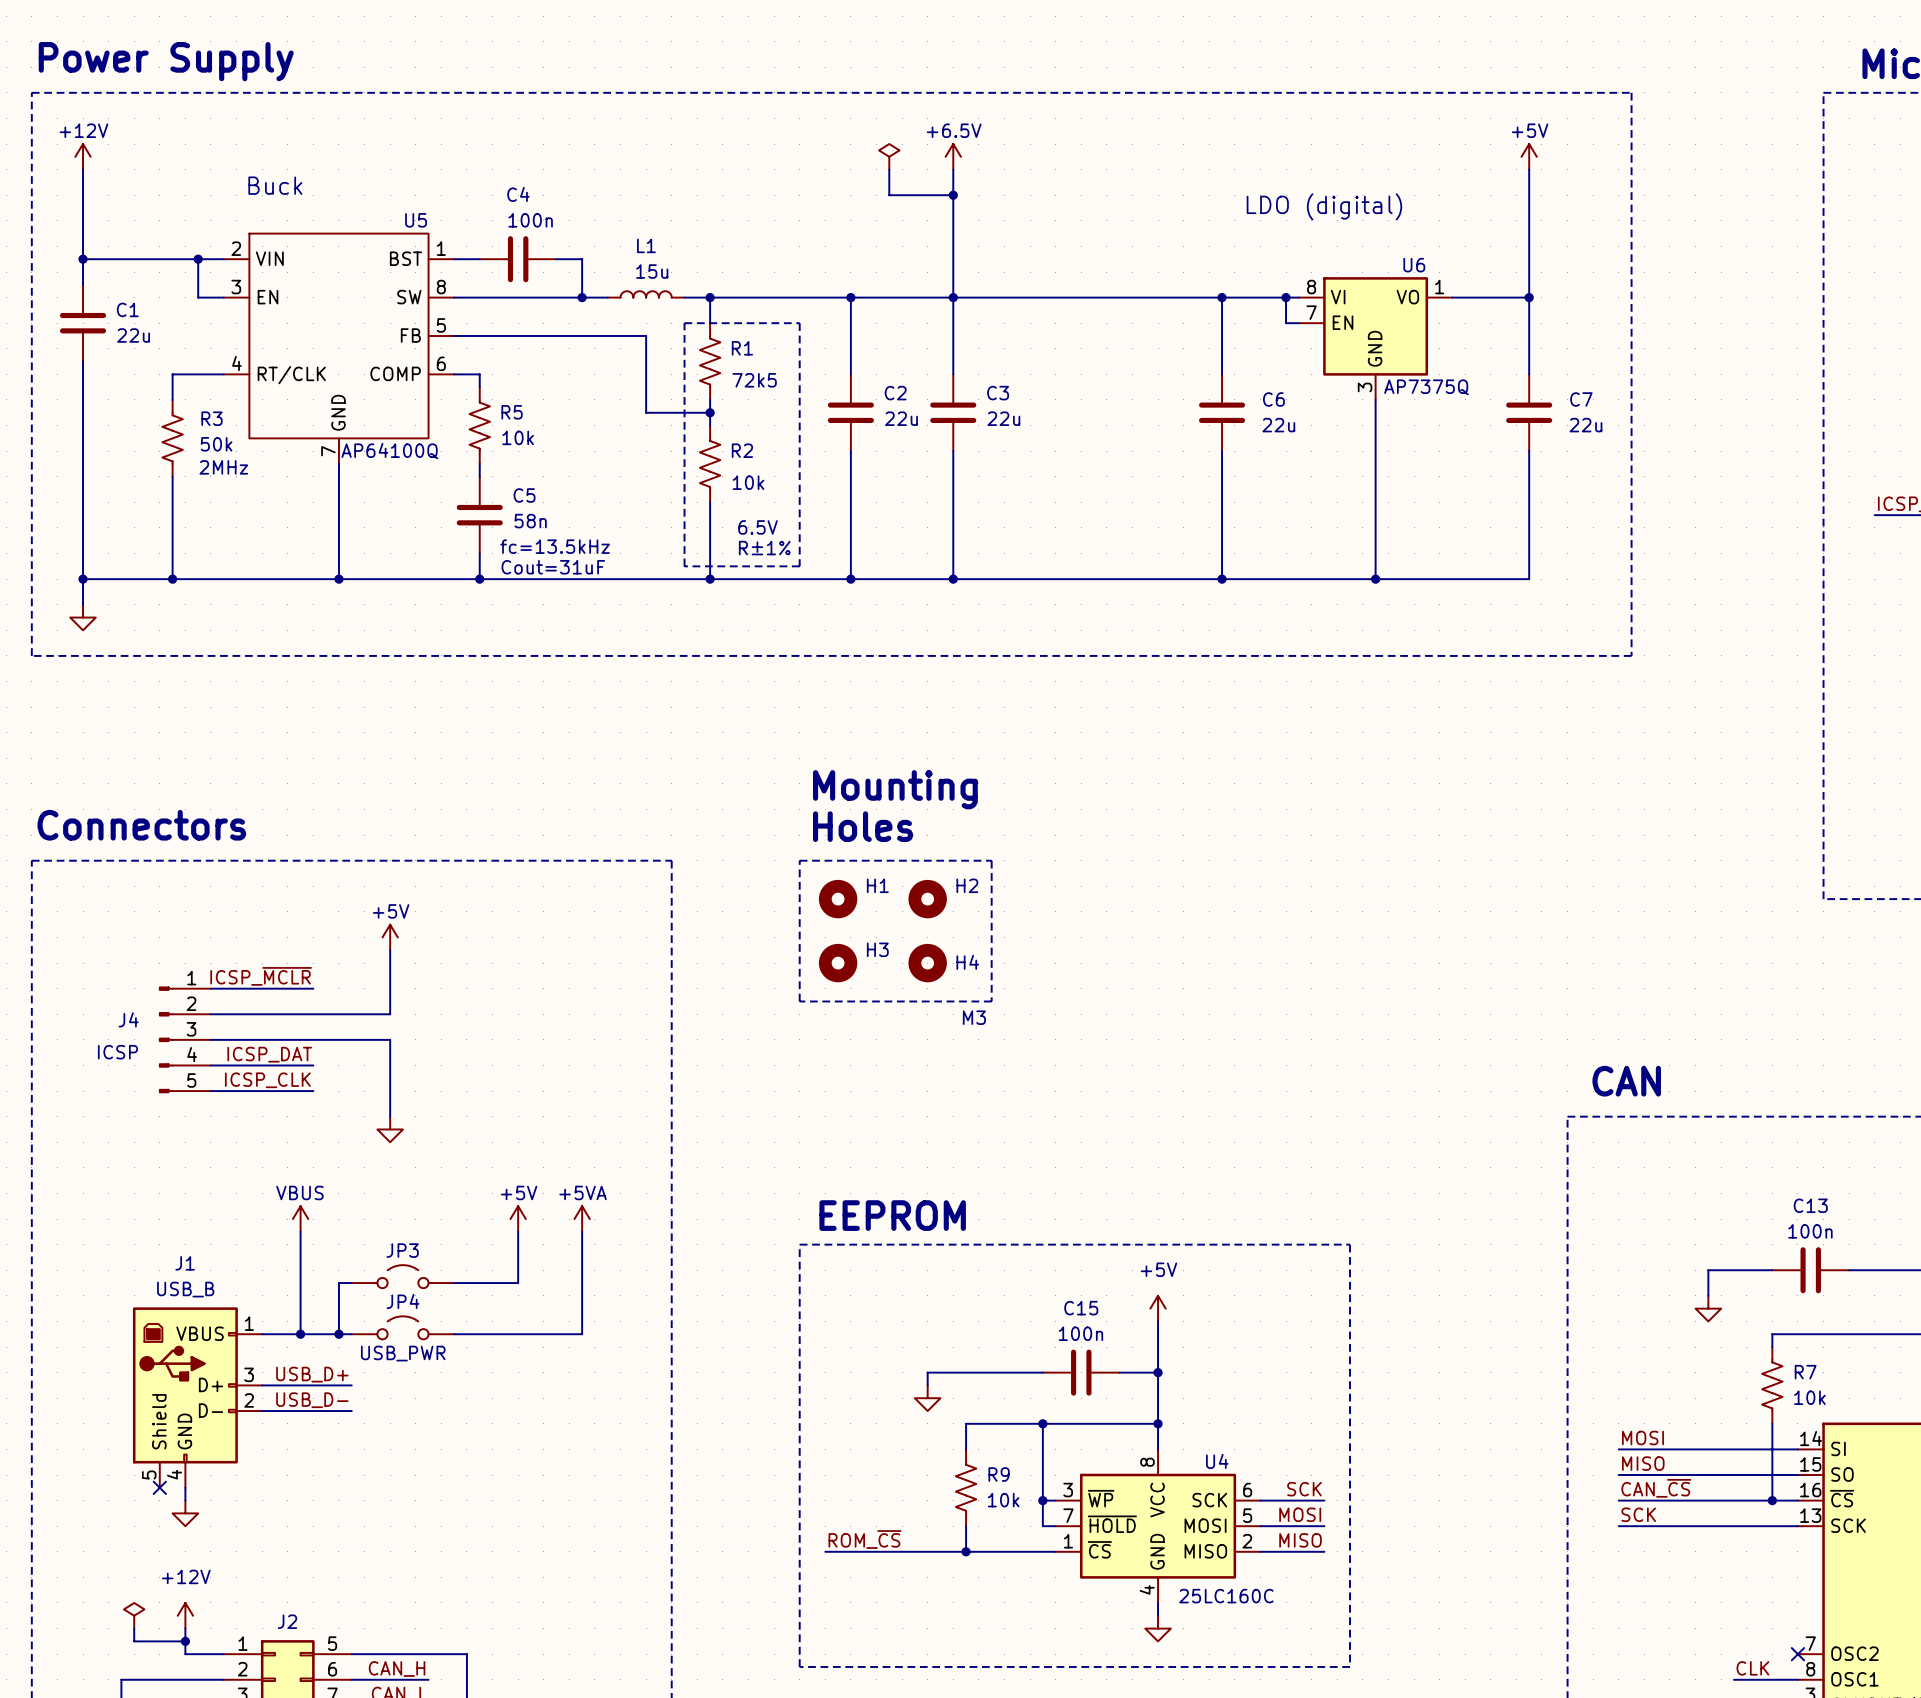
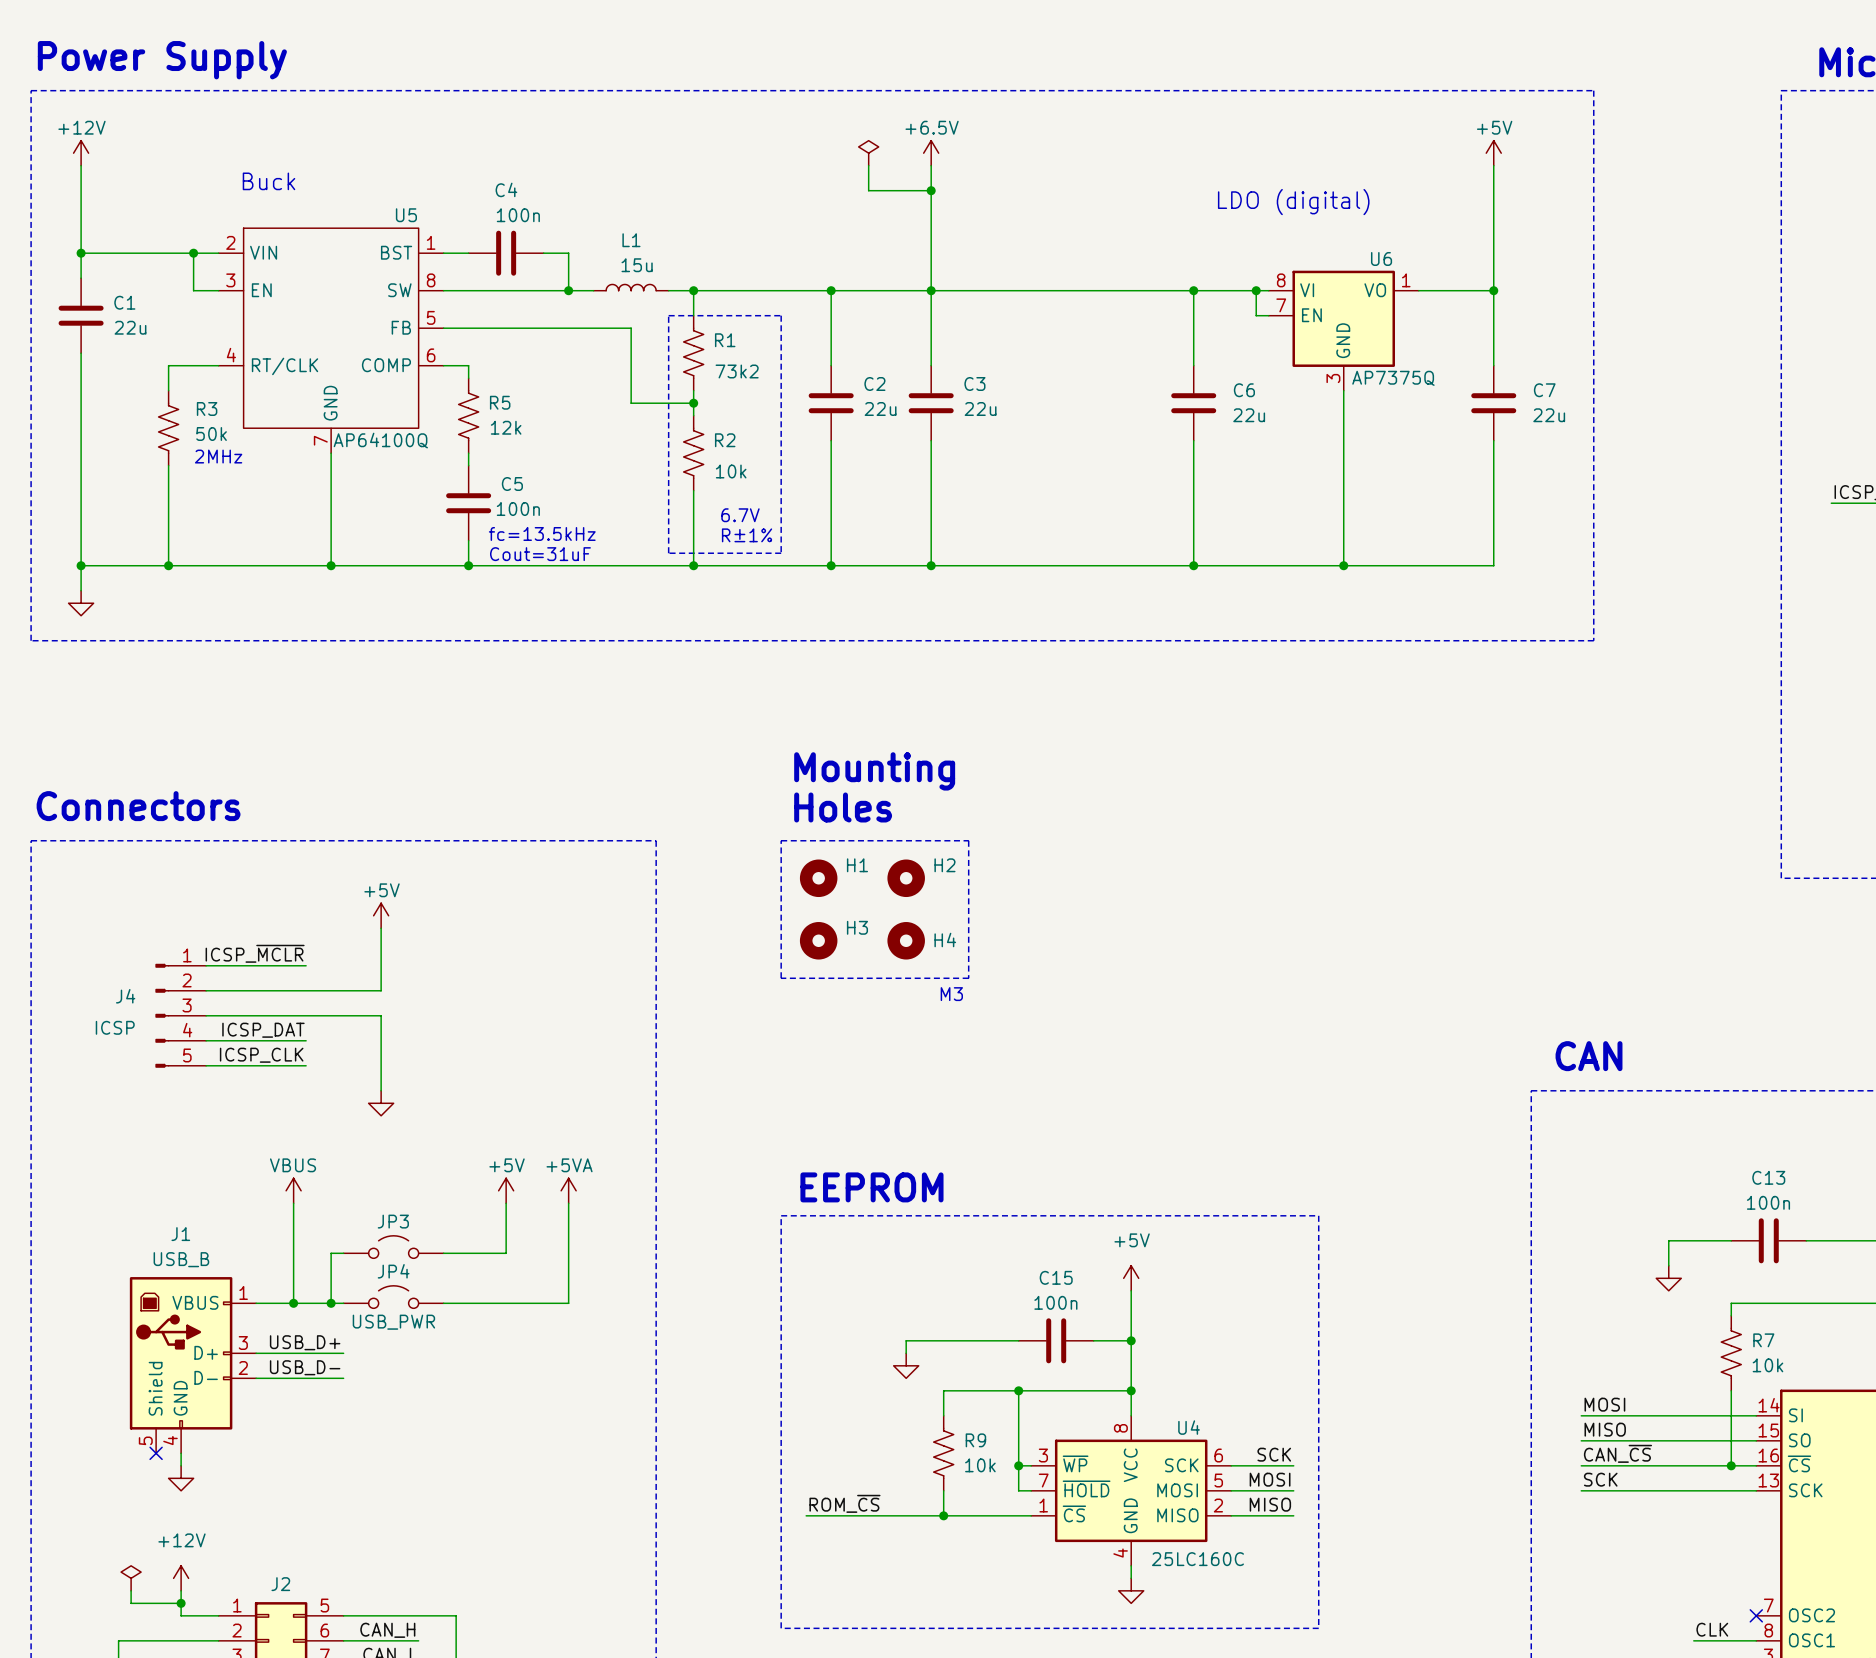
R1 value: 72k5 (754, 380) -> 73k2 (737, 371)
R5 value: 10k (518, 437) -> 12k (506, 427)
C5 value: 58n (530, 521) -> 100n (518, 509)
text: 6.5V (758, 527) -> 6.7V (740, 515)

